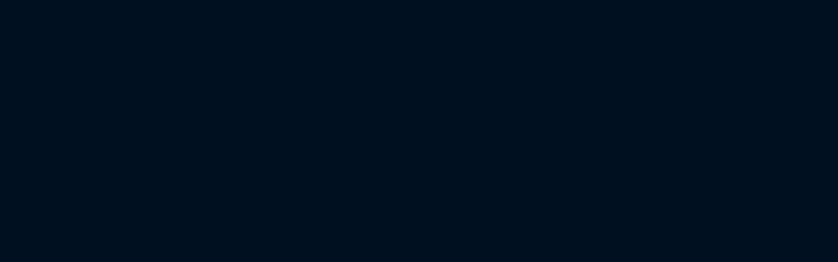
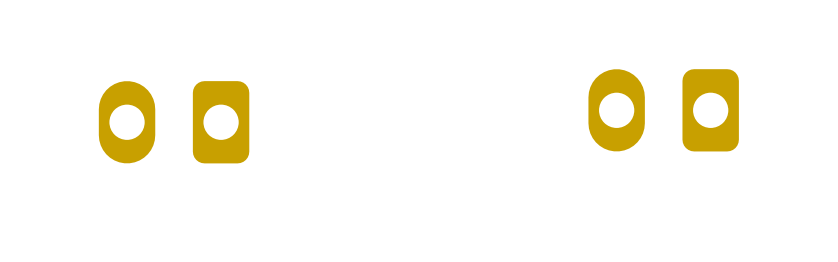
part: none -> (663, 110)
part: none -> (174, 122)

